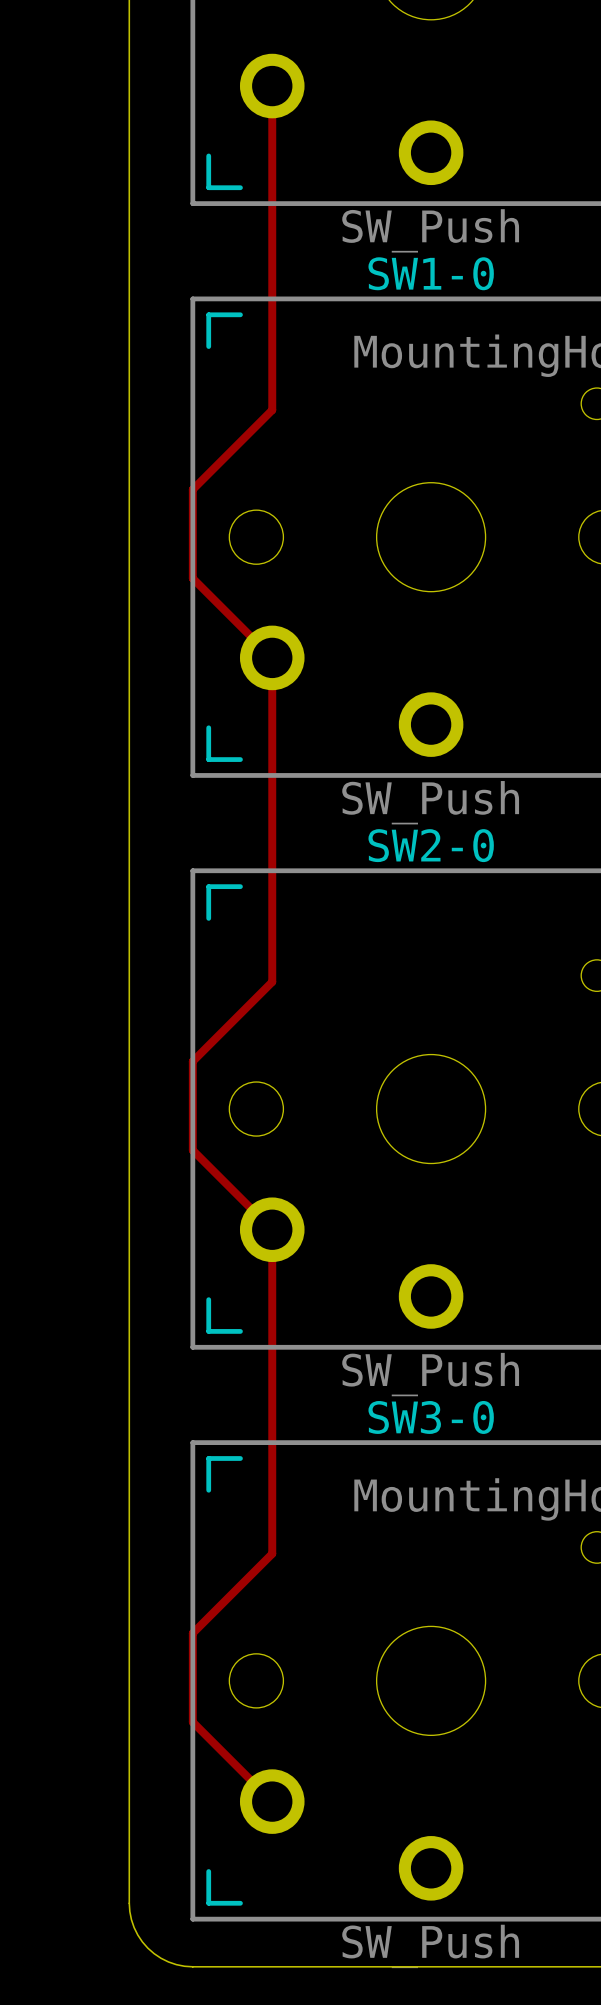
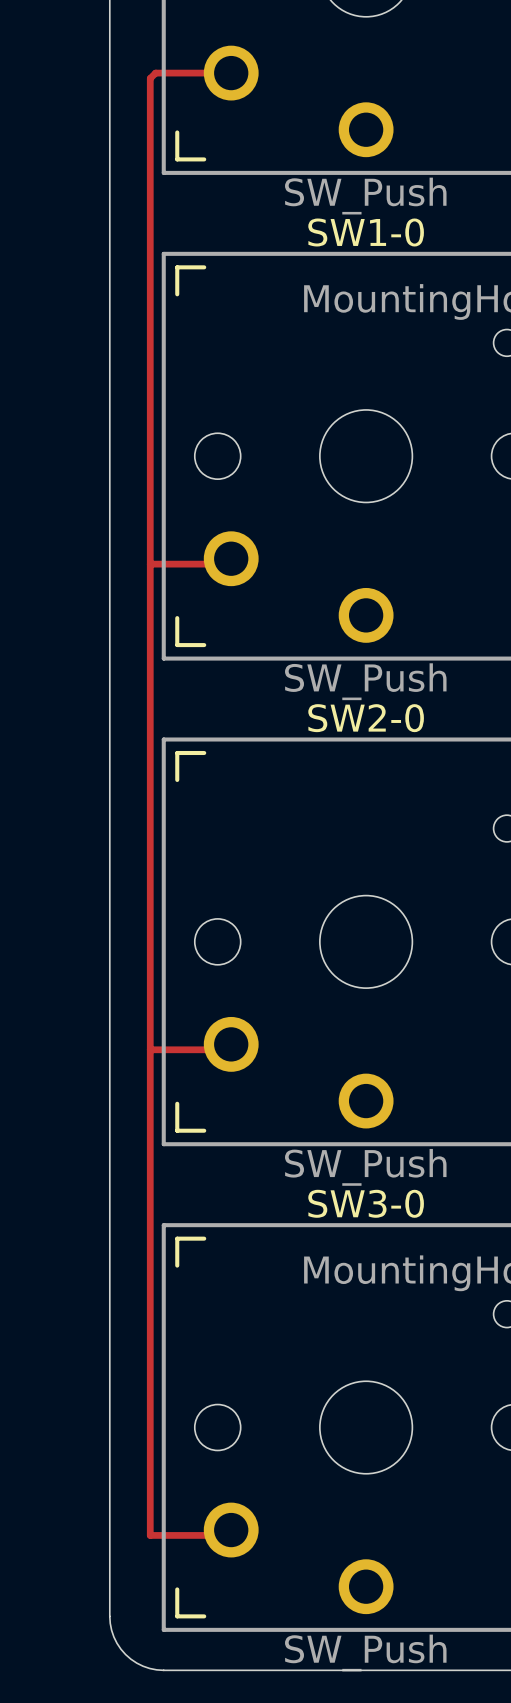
top track: (272, 86) (272, 410) (192, 489) (192, 578) (272, 657) (272, 981) (192, 1061) (192, 1150) (272, 1229) (272, 1553) (192, 1633) (192, 1722) (272, 1801) -> (231, 73) (155, 73) (150, 78) (150, 1535) (225, 1535)
top track: none -> (150, 564) (225, 564)
top track: none -> (150, 1049) (225, 1049)

